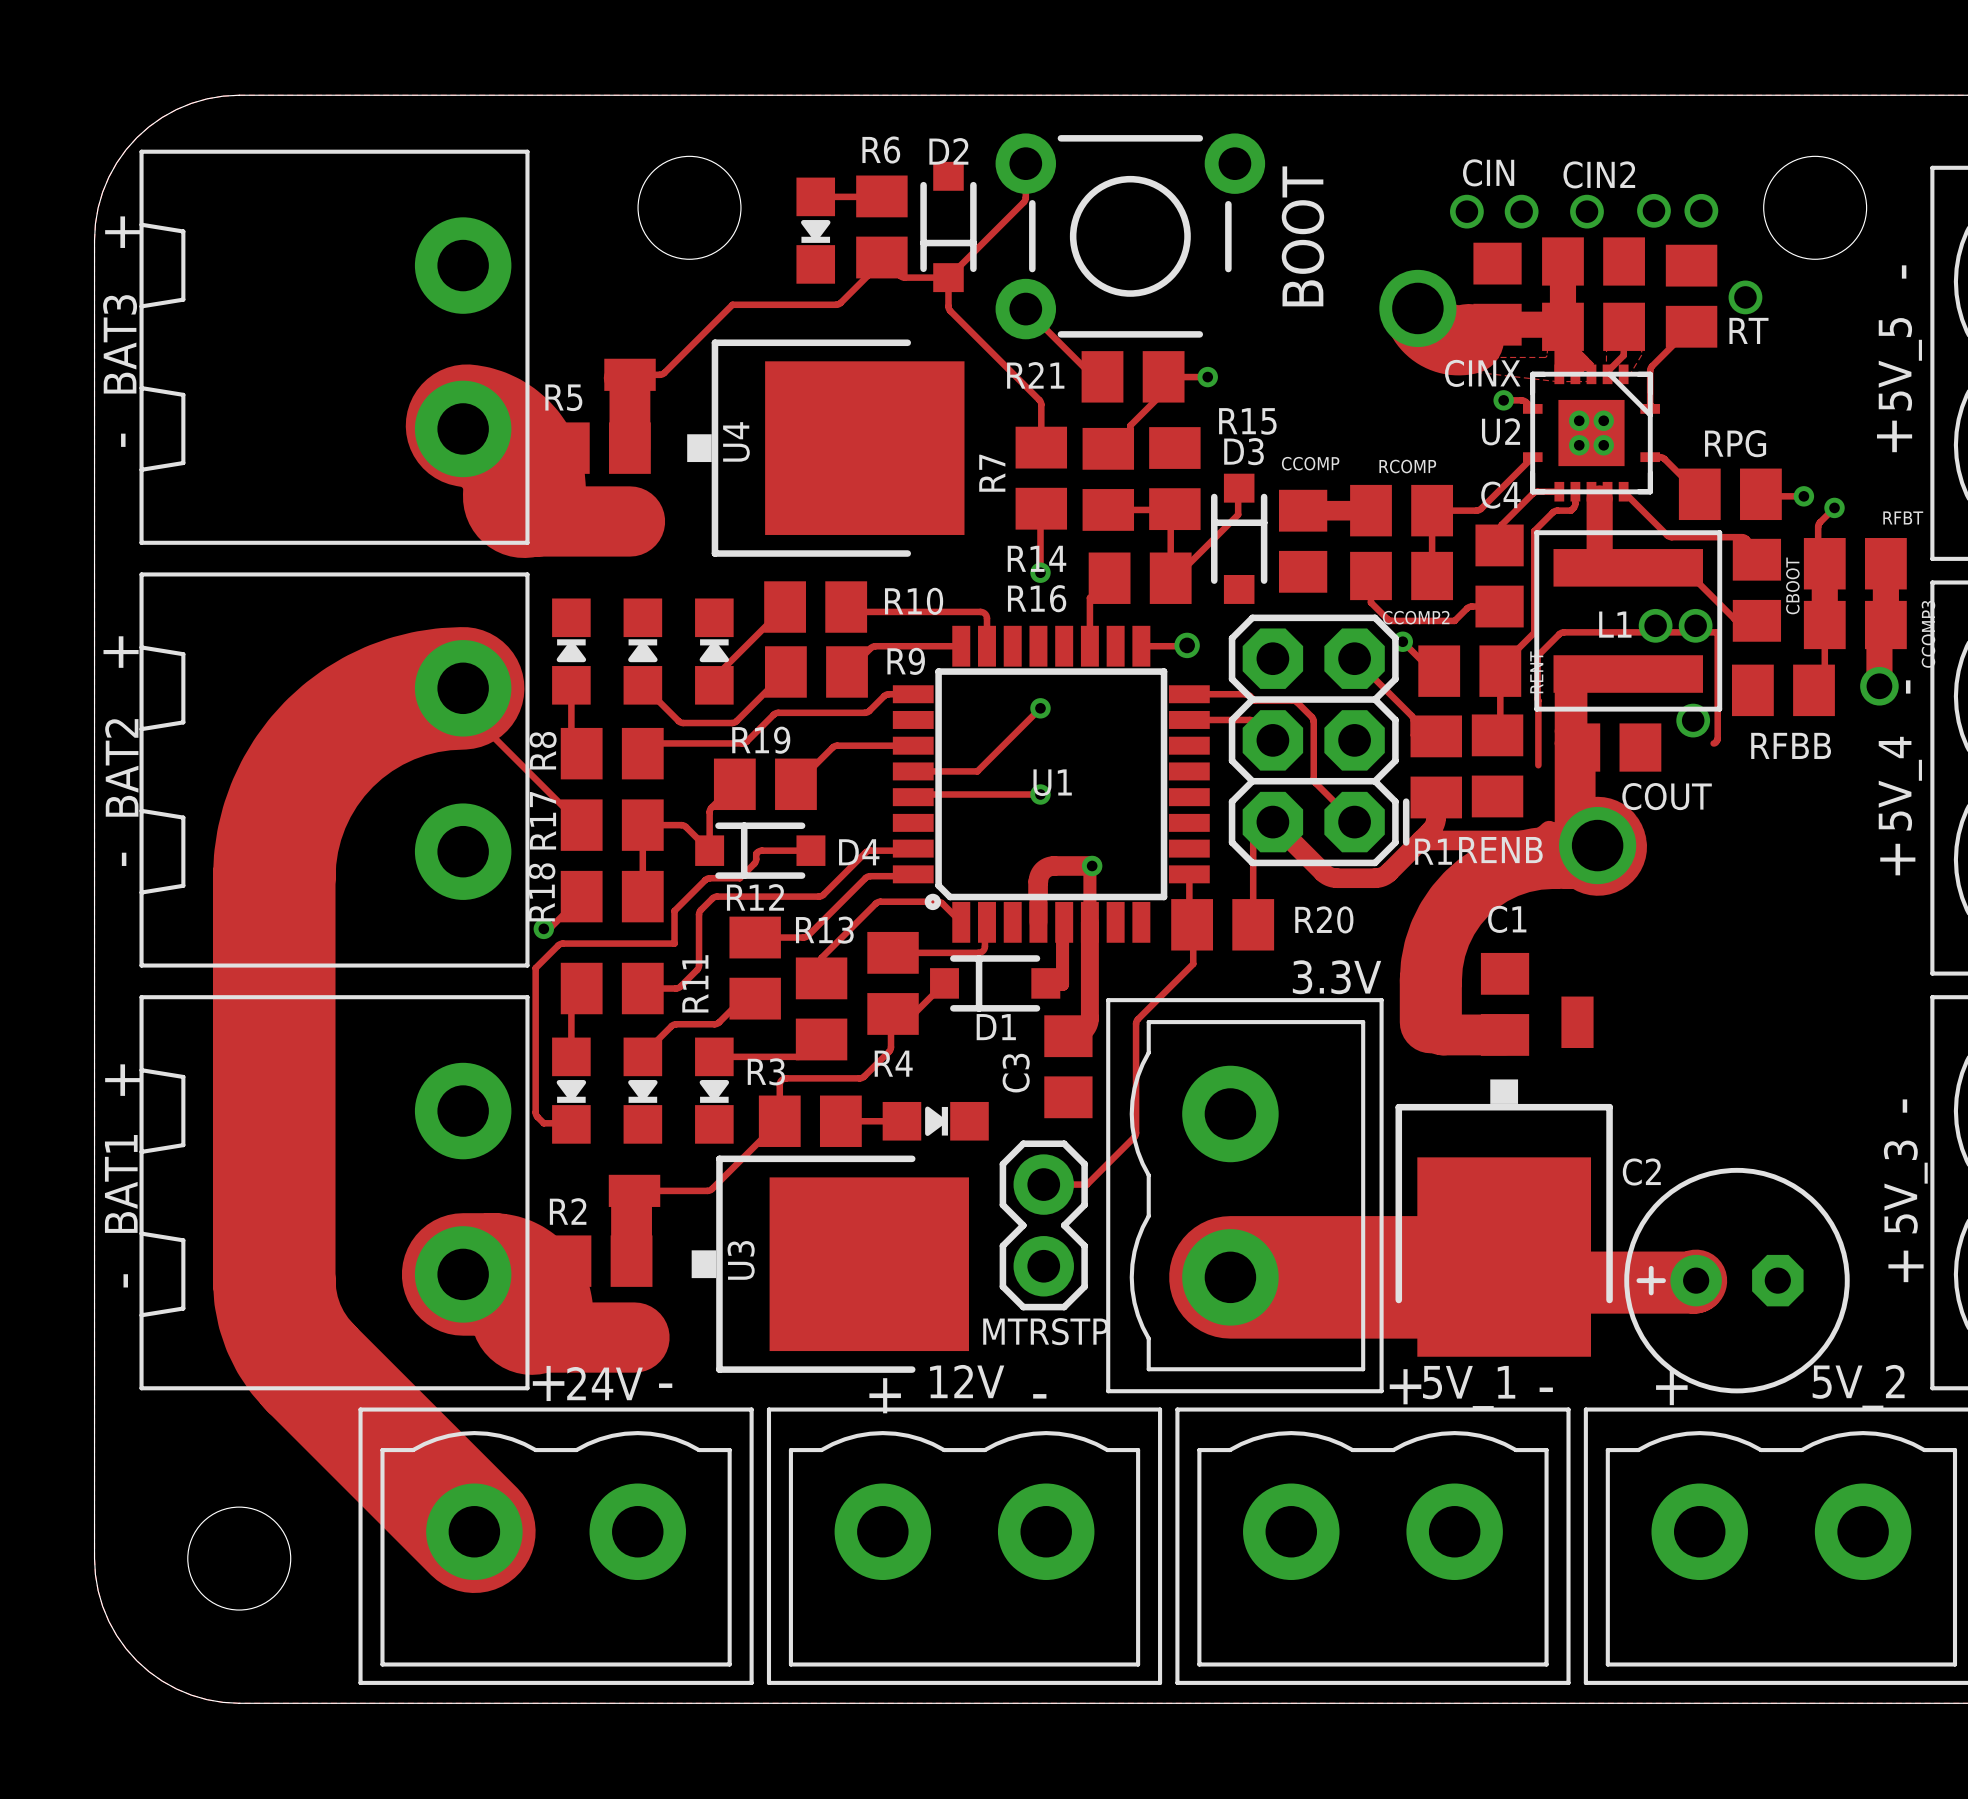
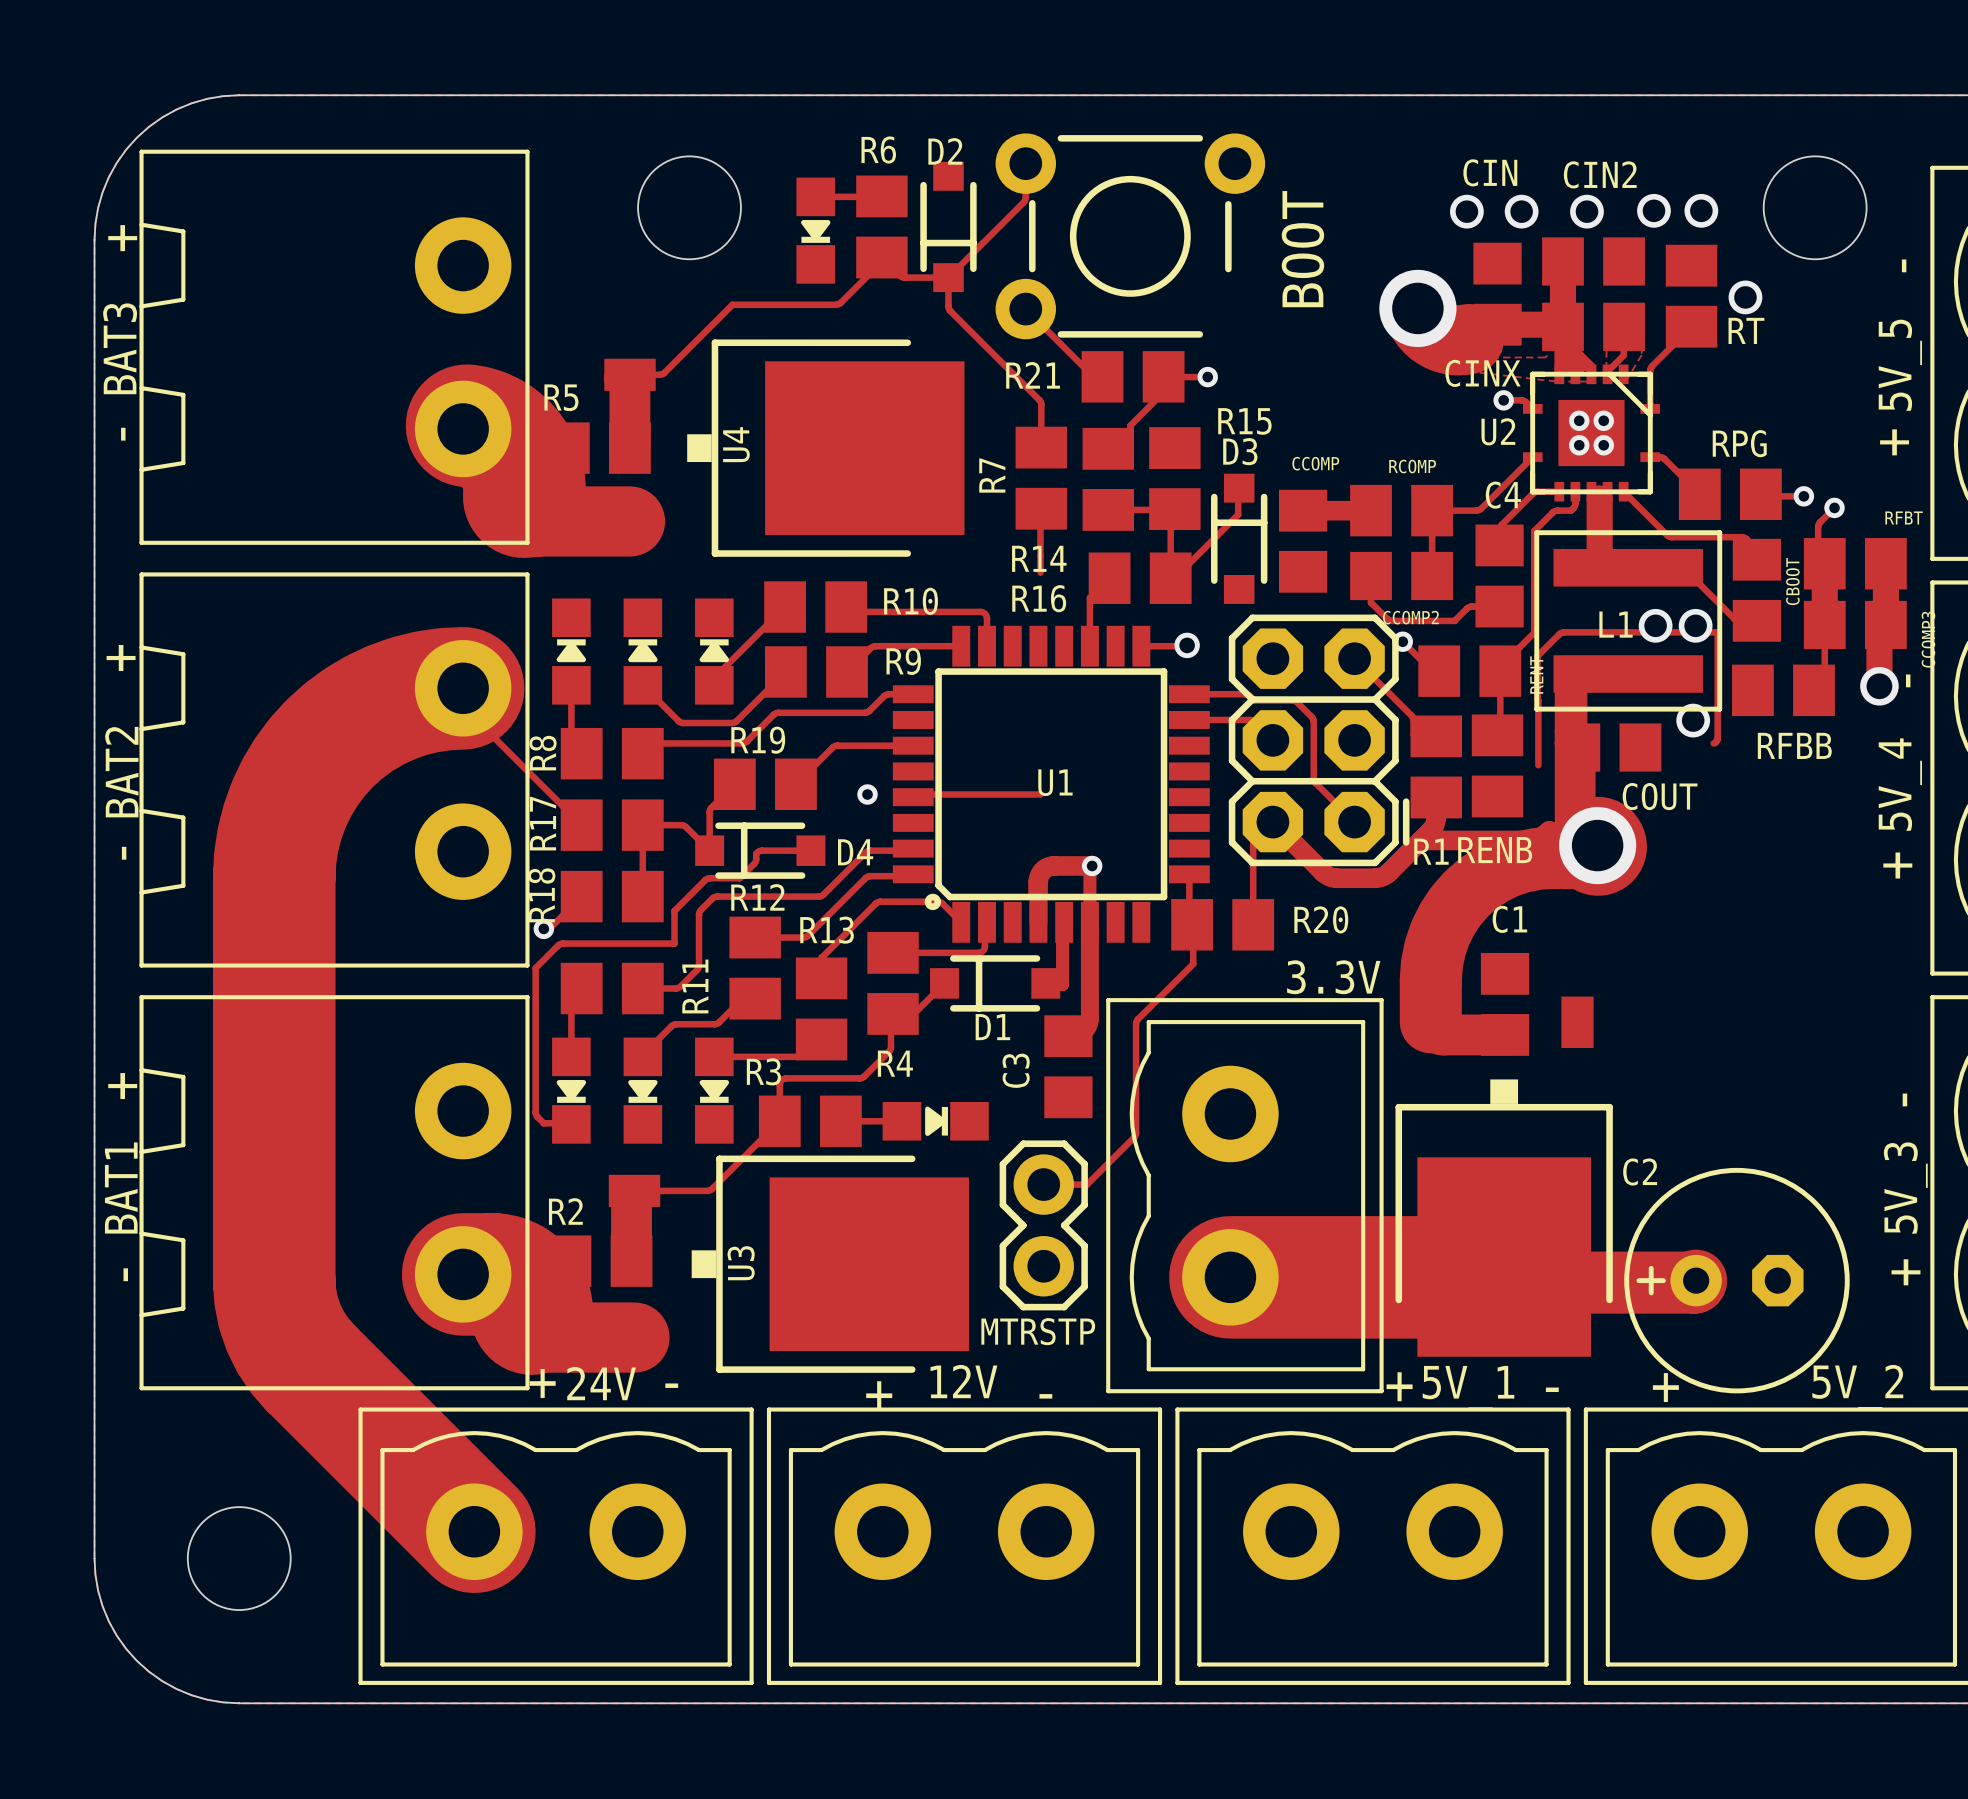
via: (1040, 572) -> none
track: (1040, 708) (977, 771) (913, 771) -> none
via: (1040, 708) -> none
via: none -> (867, 794)
via: (1040, 794) -> none

